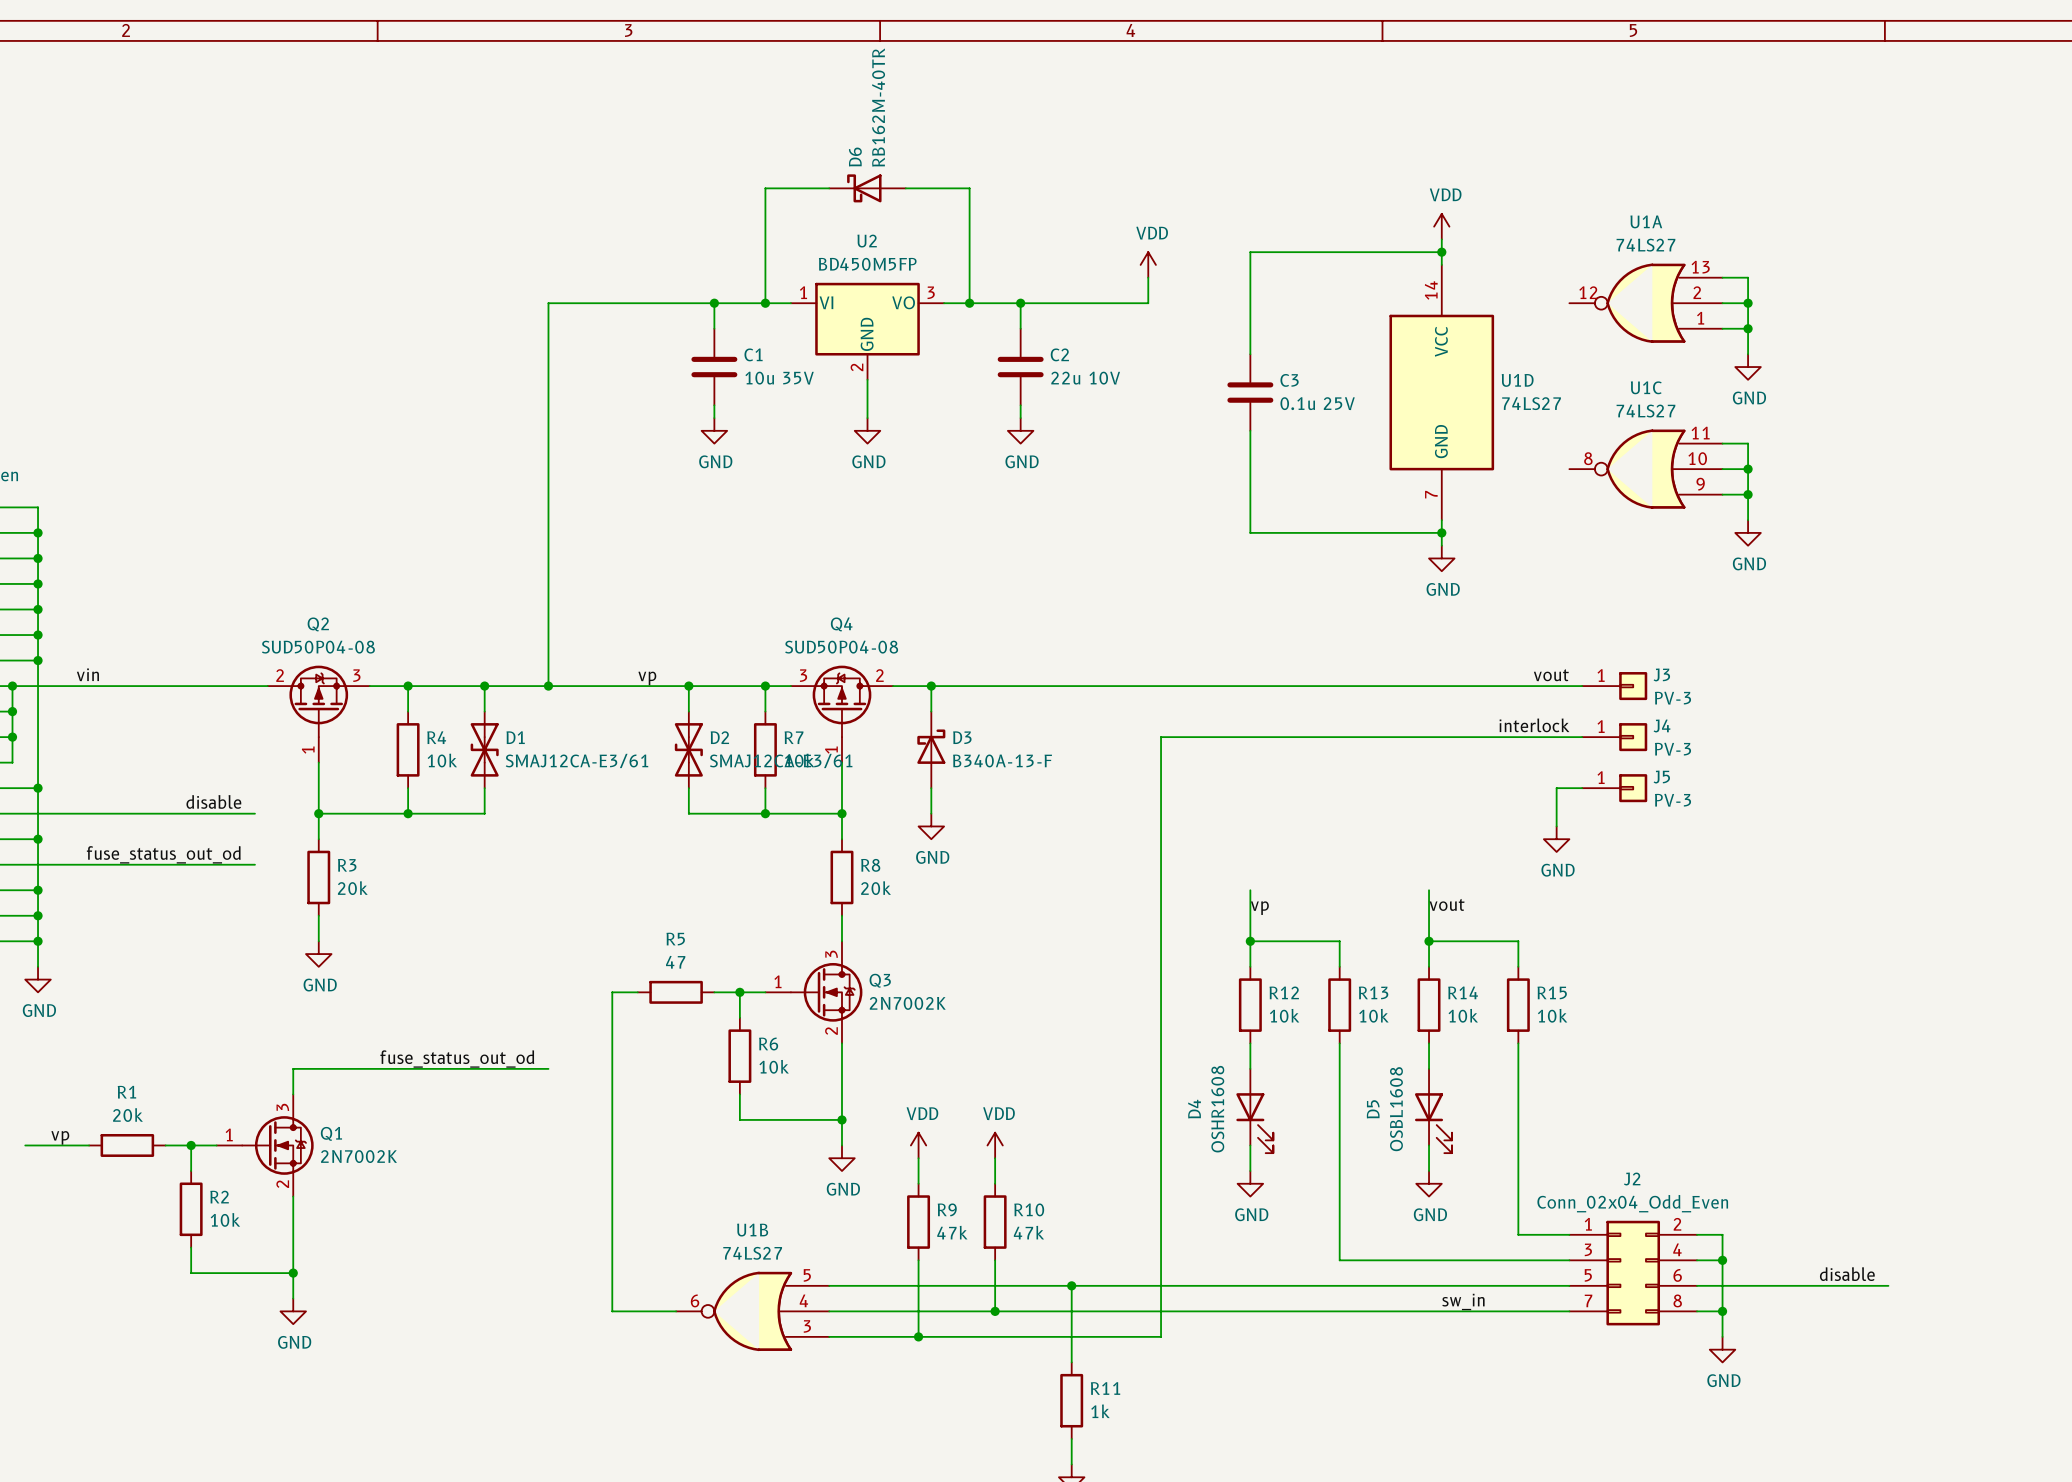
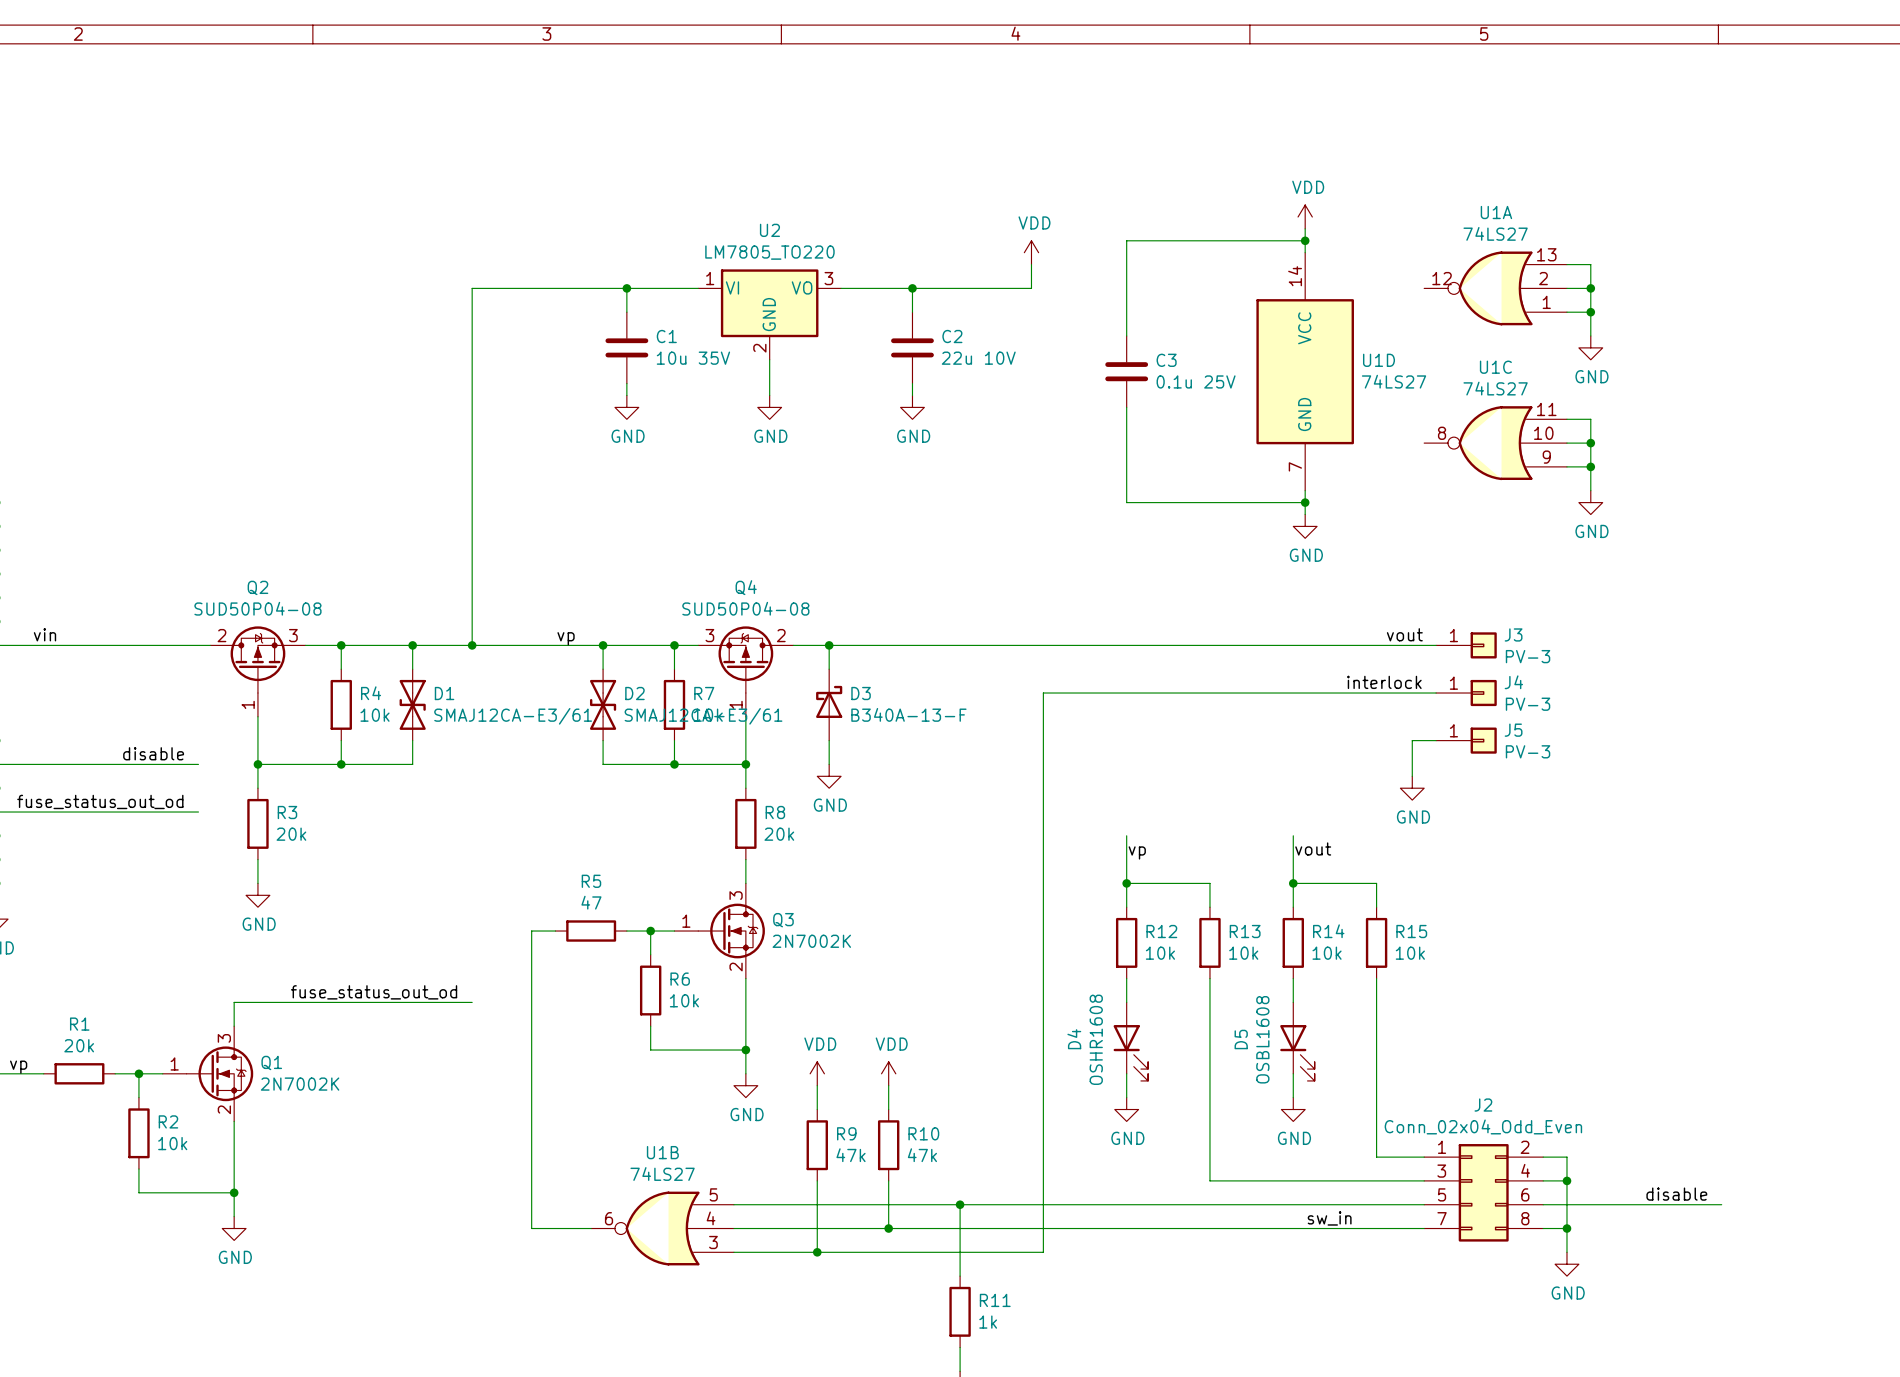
wire: (829, 188) (765, 188) (765, 303) -> none
D6: RB162M-40TR (867, 188) -> none
wire: (905, 188) (969, 188) (969, 303) -> none
U2 value: BD450M5FP (867, 264) -> LM7805_TO220 (769, 252)
junction: (765, 303) -> none
junction: (969, 303) -> none

